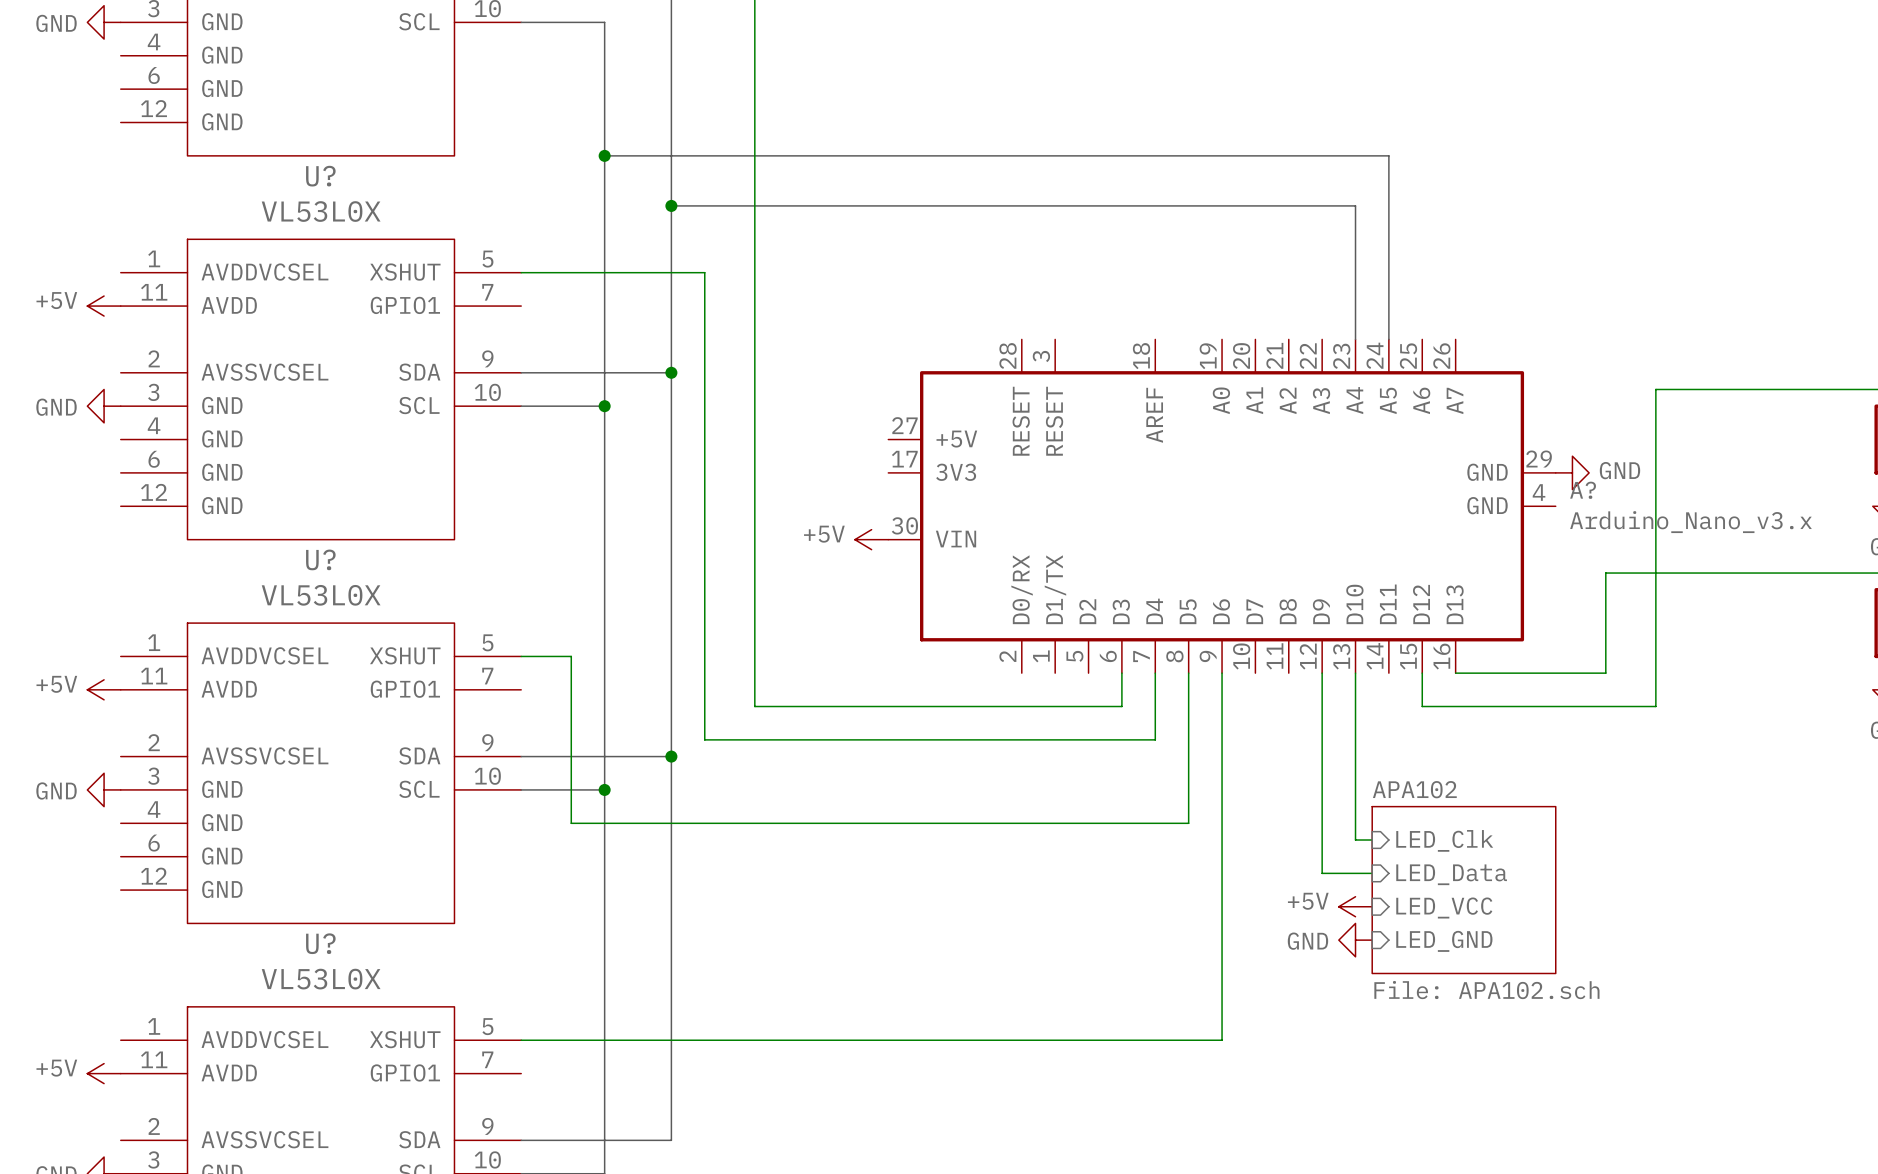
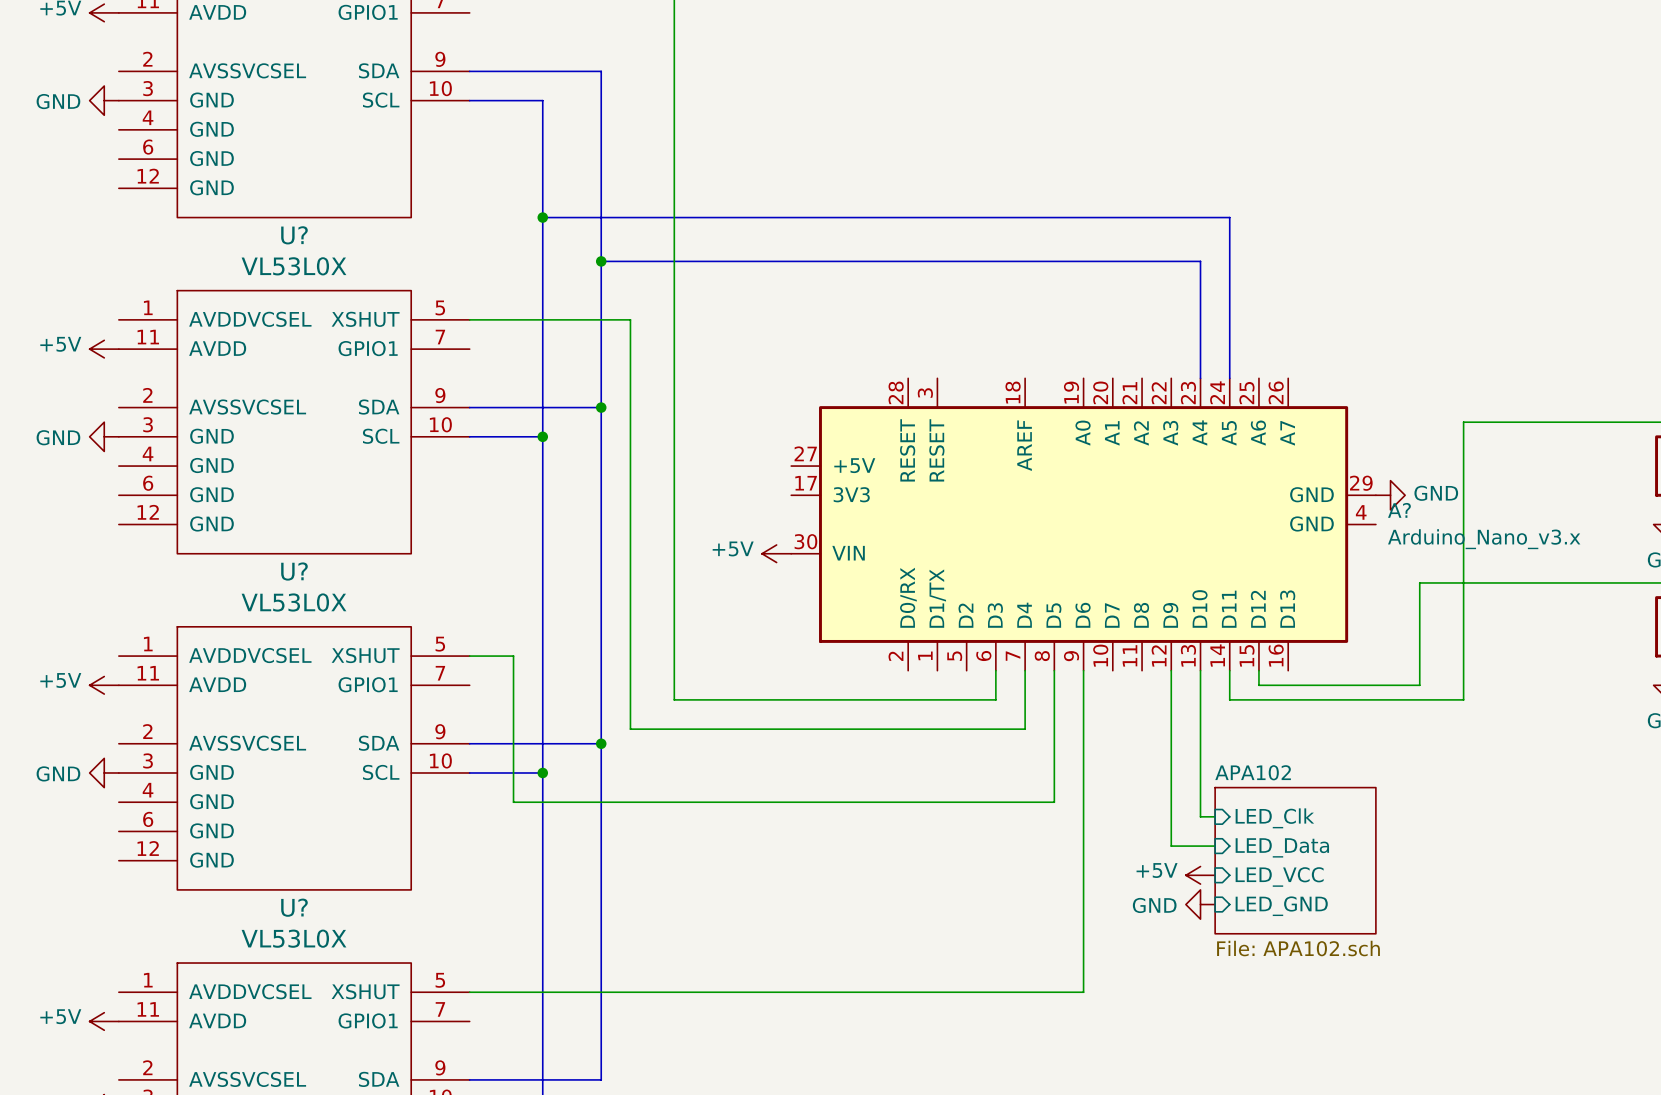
wire: (1455, 673) (1605, 673) -> (1258, 685) (1419, 685) (1419, 670)
wire: (1422, 689) (1422, 706) -> (1229, 670) (1229, 699) (1258, 699)

